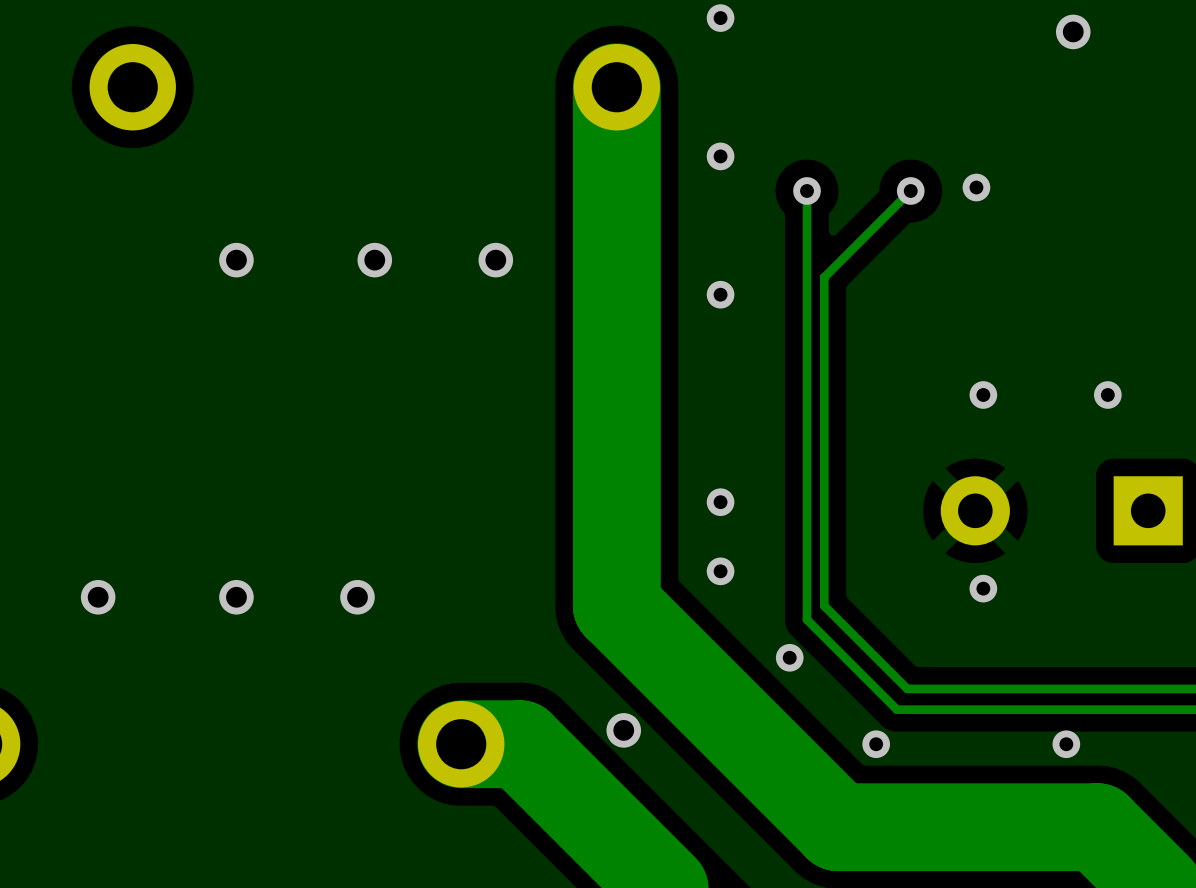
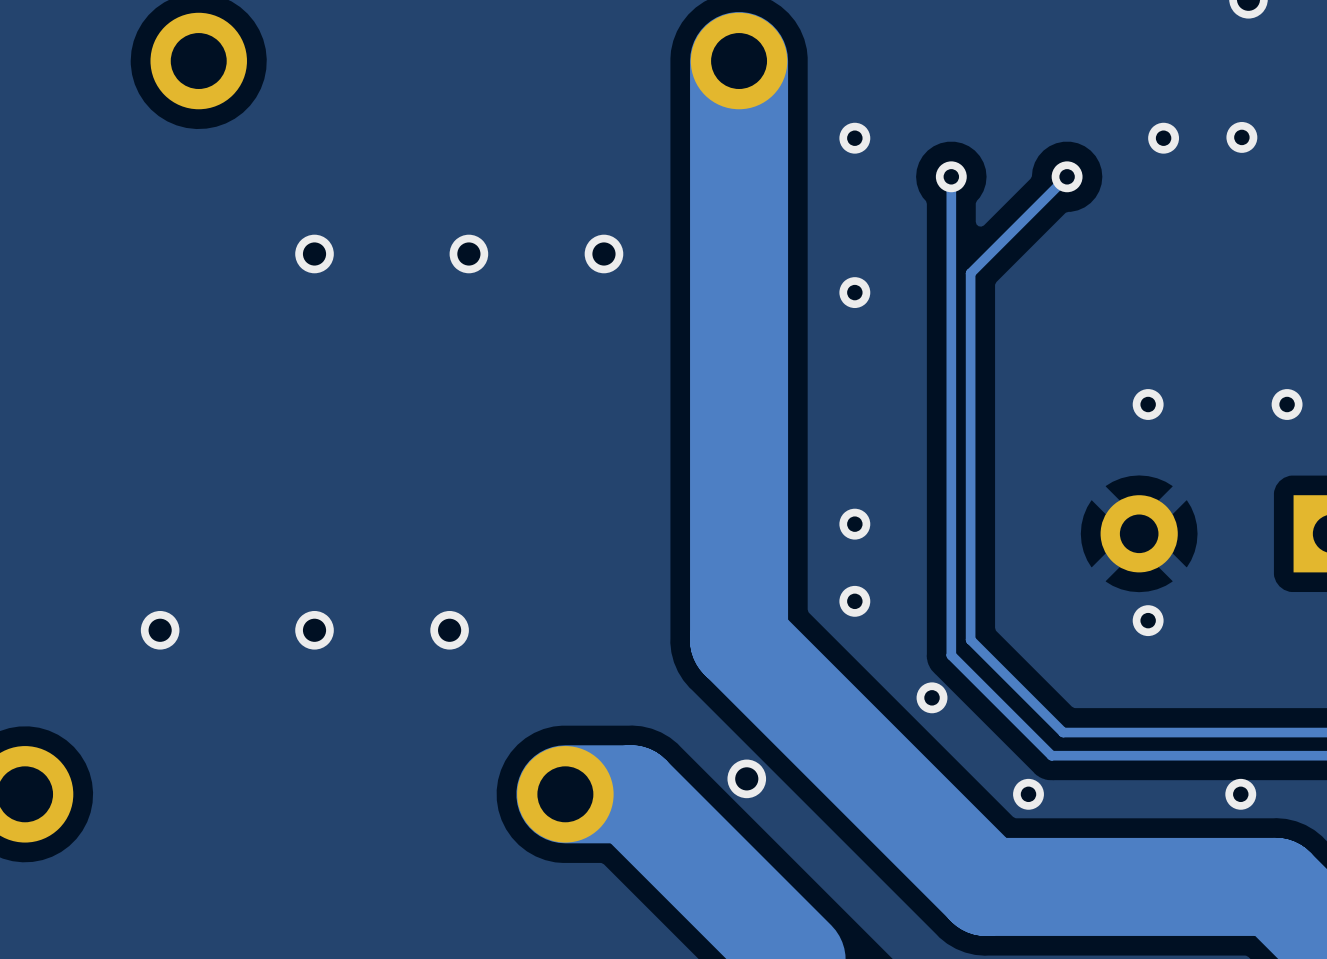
via: none -> (1241, 137)
via position: (976, 187) -> (1163, 138)

